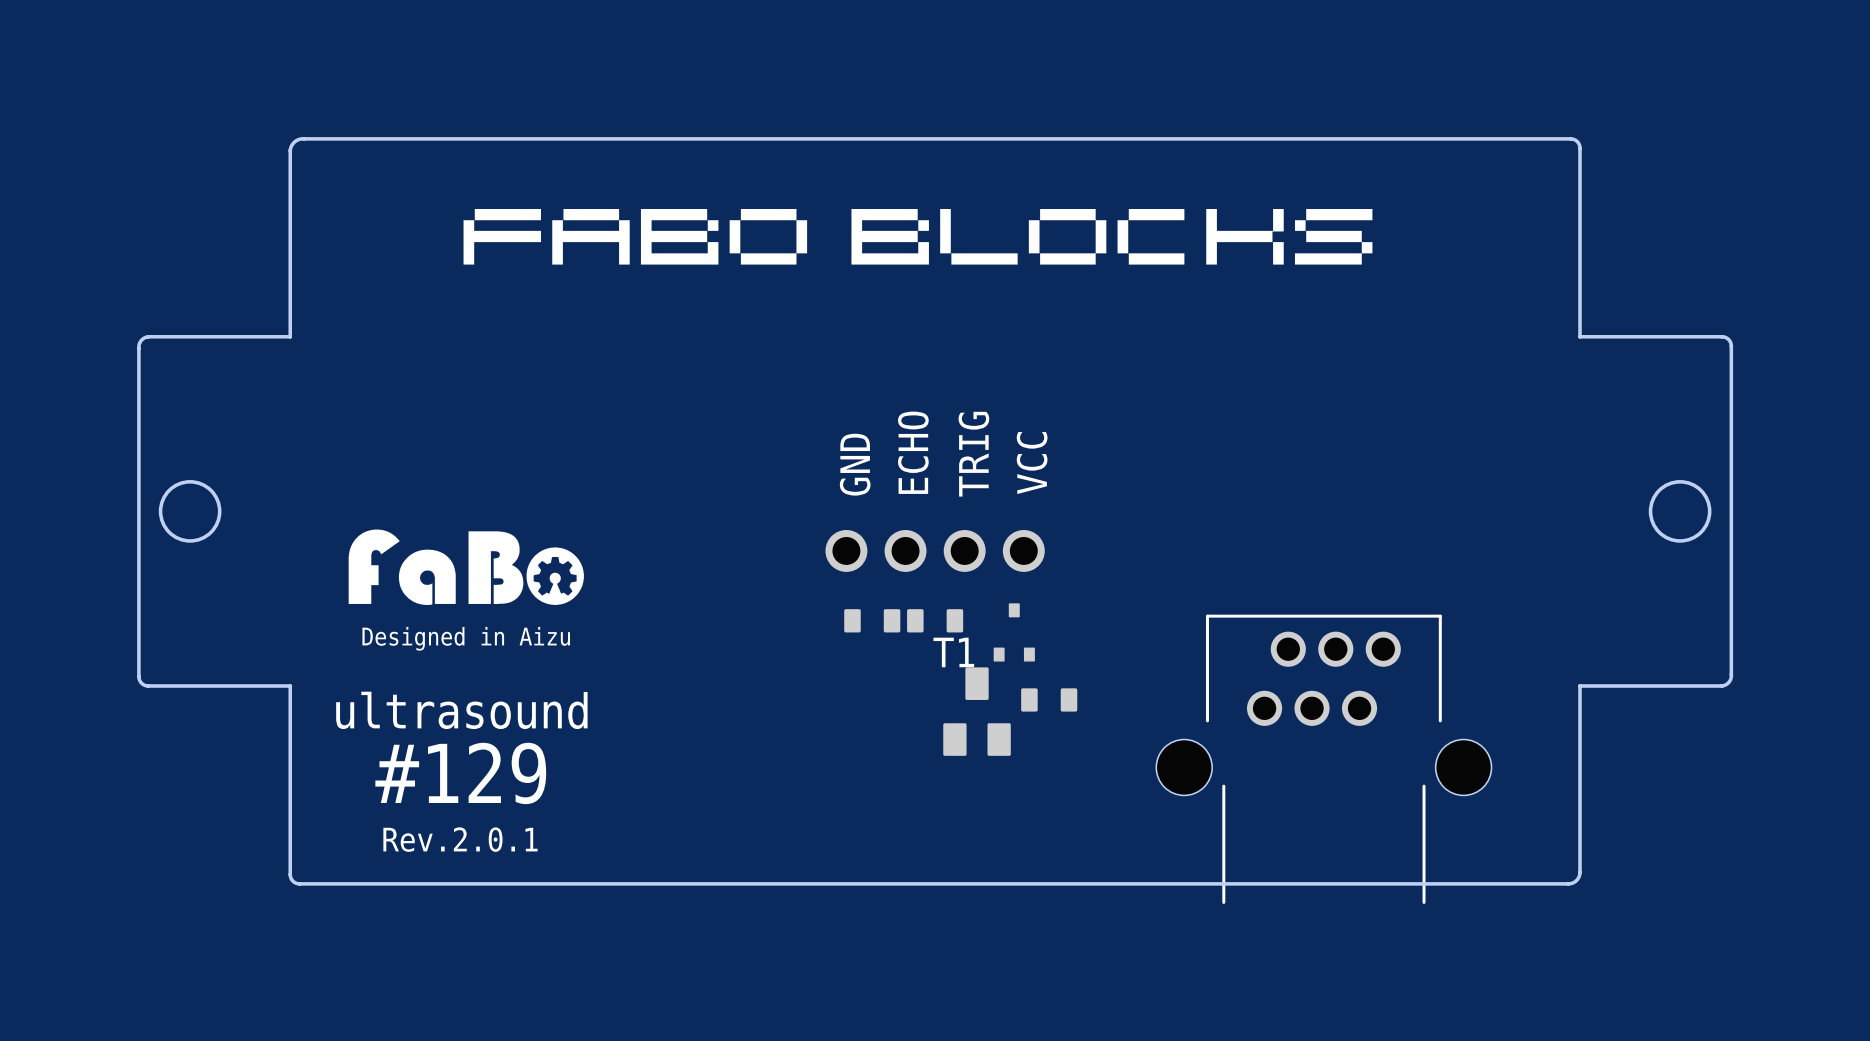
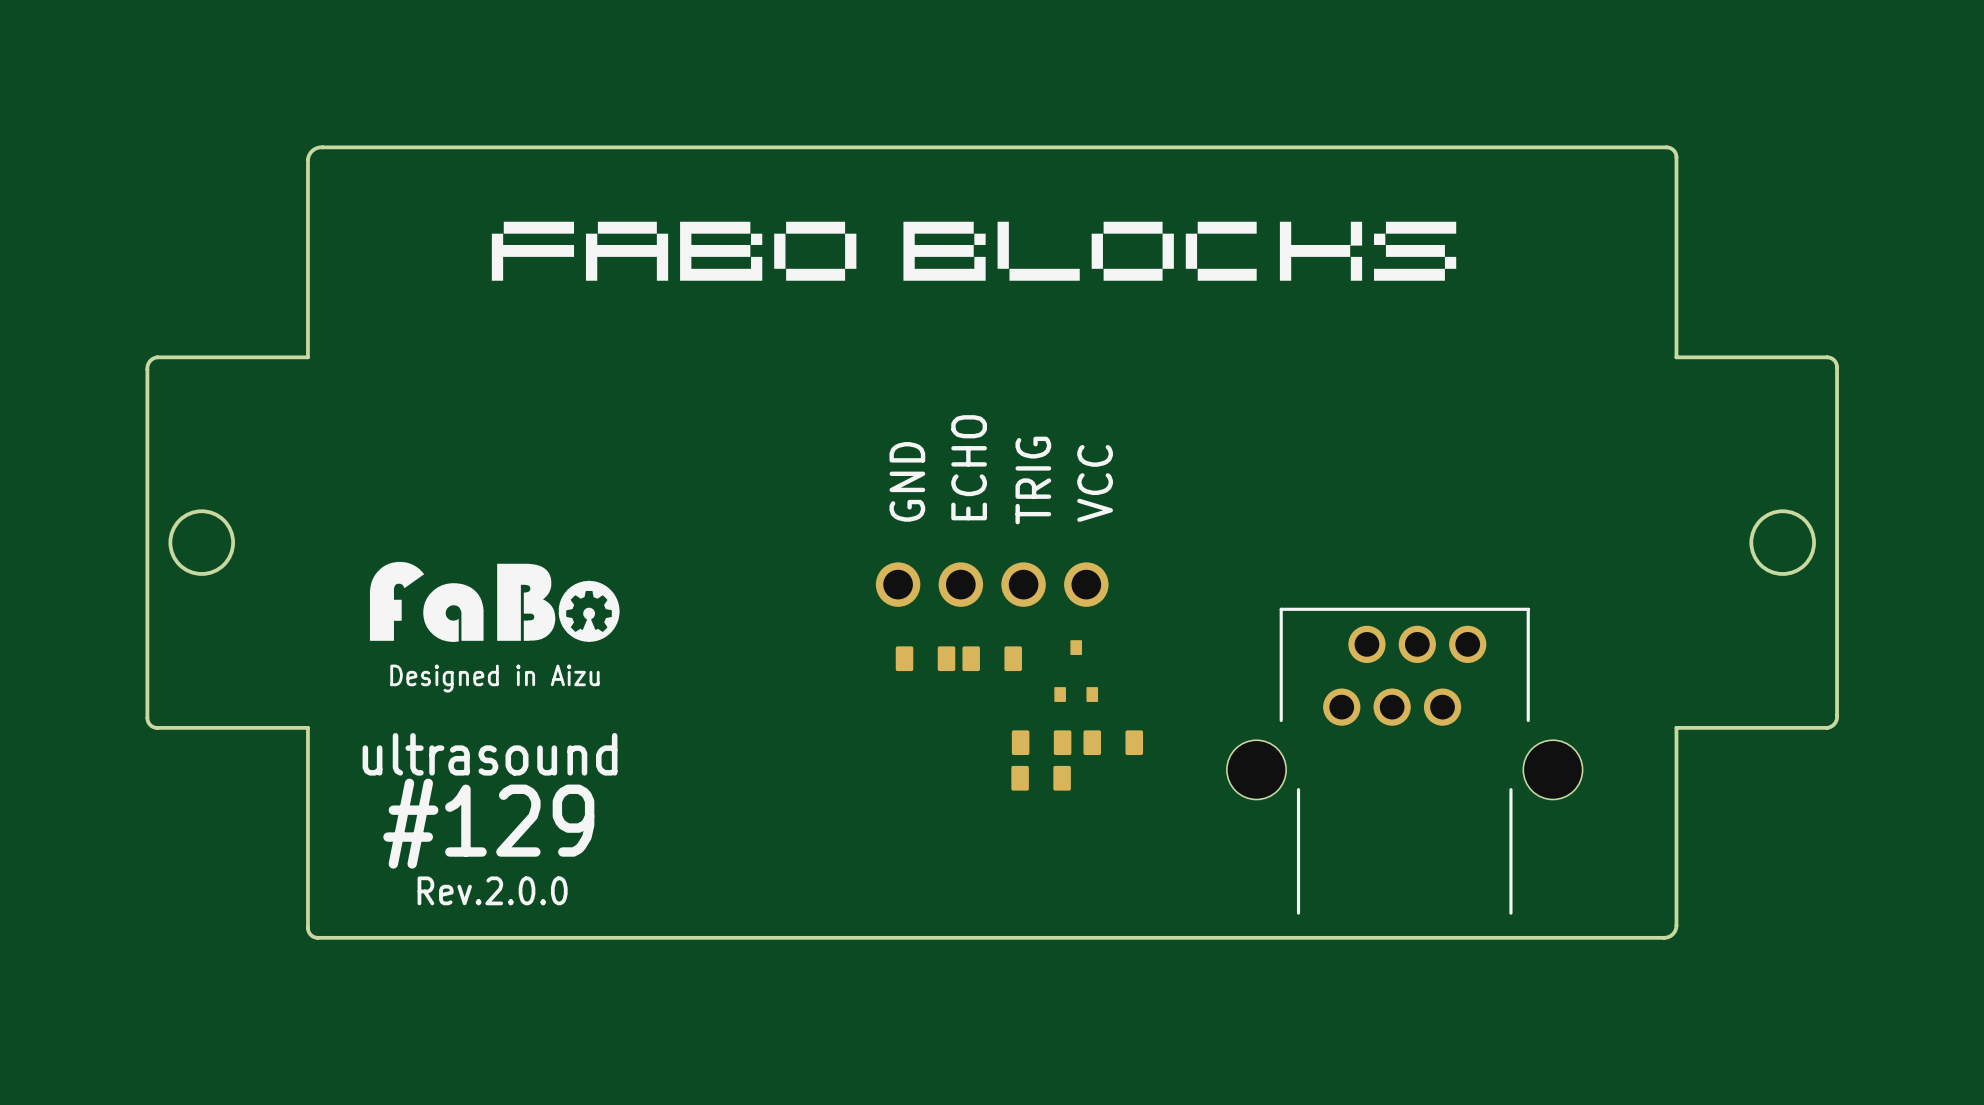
part: none -> (1041, 742)
T1: (977, 711) -> none
part: none -> (1041, 778)
part position: (1323, 759) -> (1404, 761)
text: Rev.2.0.1 (460, 839) -> Rev.2.0.0 (492, 890)

